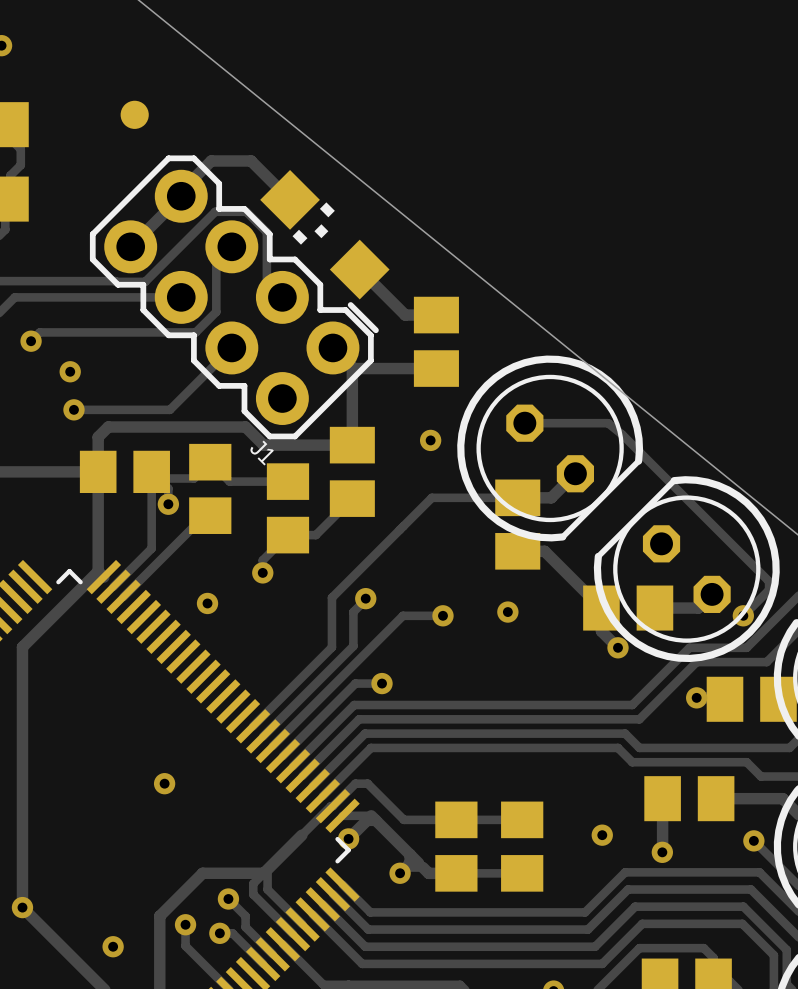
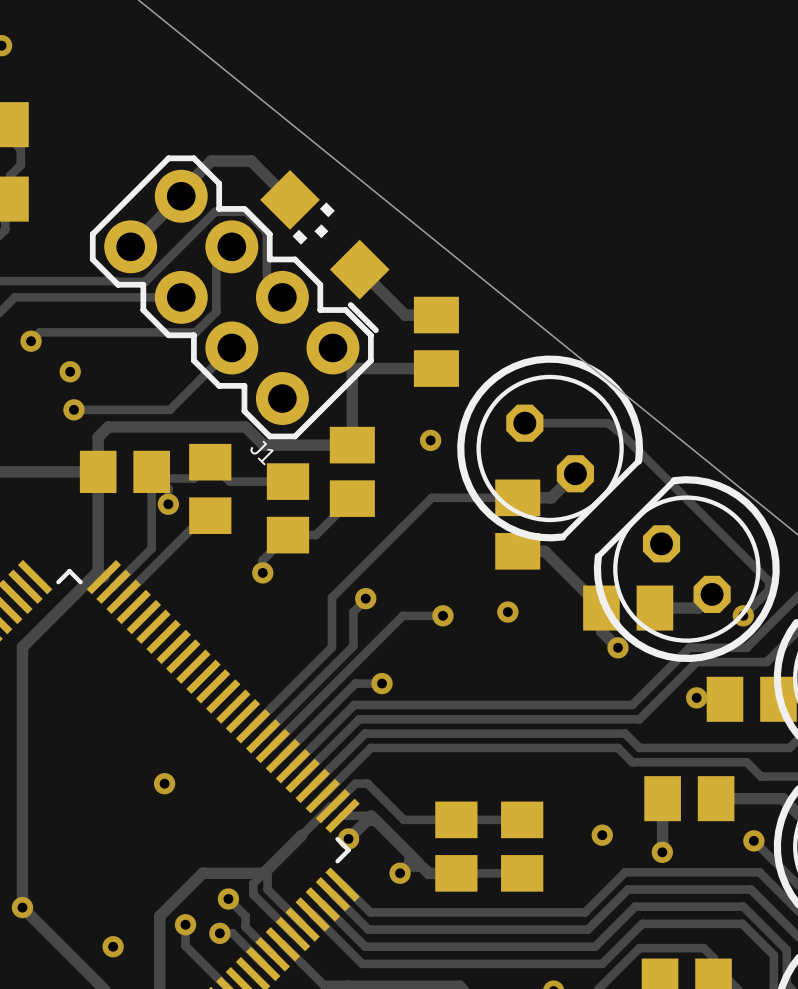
part: (134, 114) -> none
via: (207, 603) -> none

